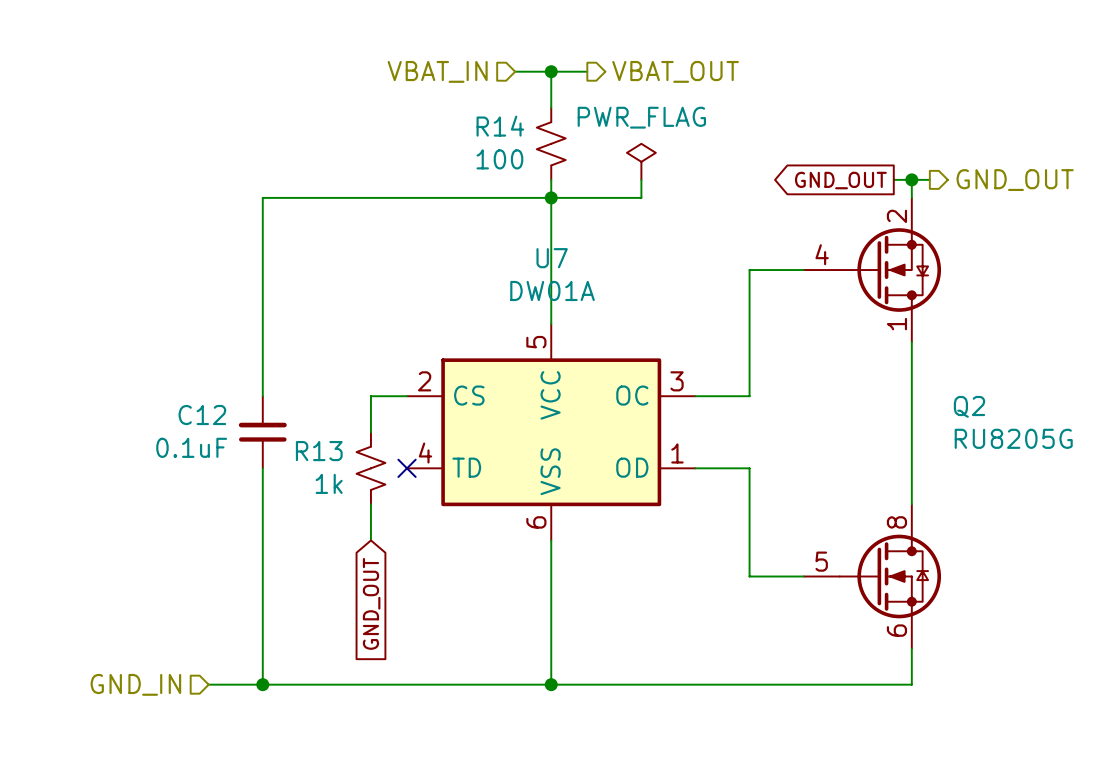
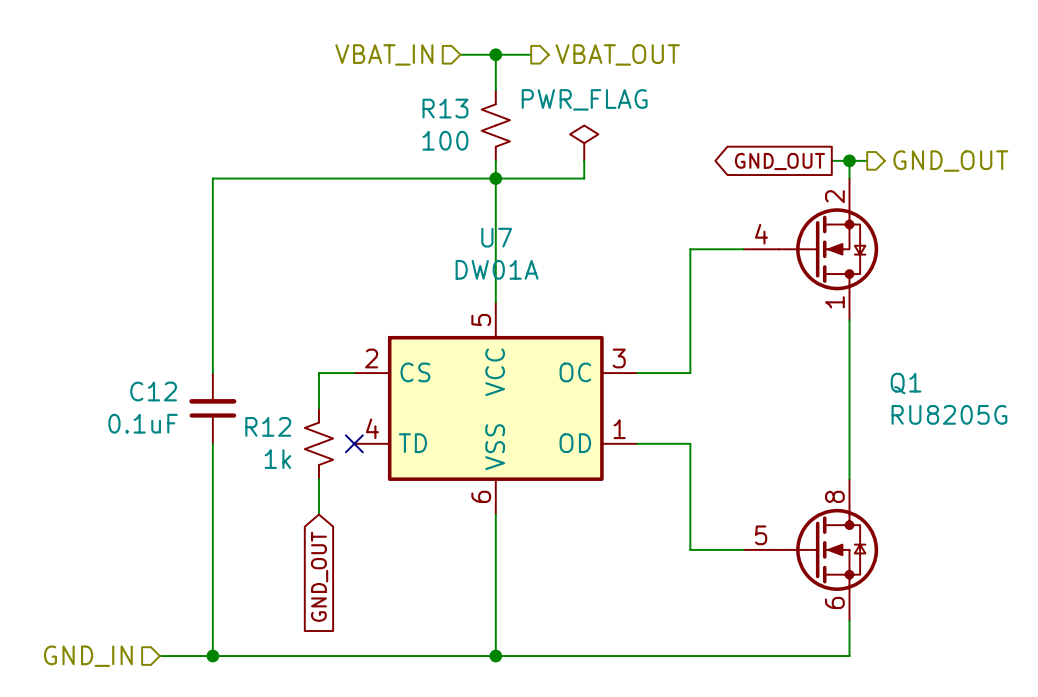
R14 name: R14 (500, 126) -> R13 (445, 108)
Q2 name: Q2 (969, 406) -> Q1 (906, 383)
R13 name: R13 (319, 451) -> R12 (268, 426)

